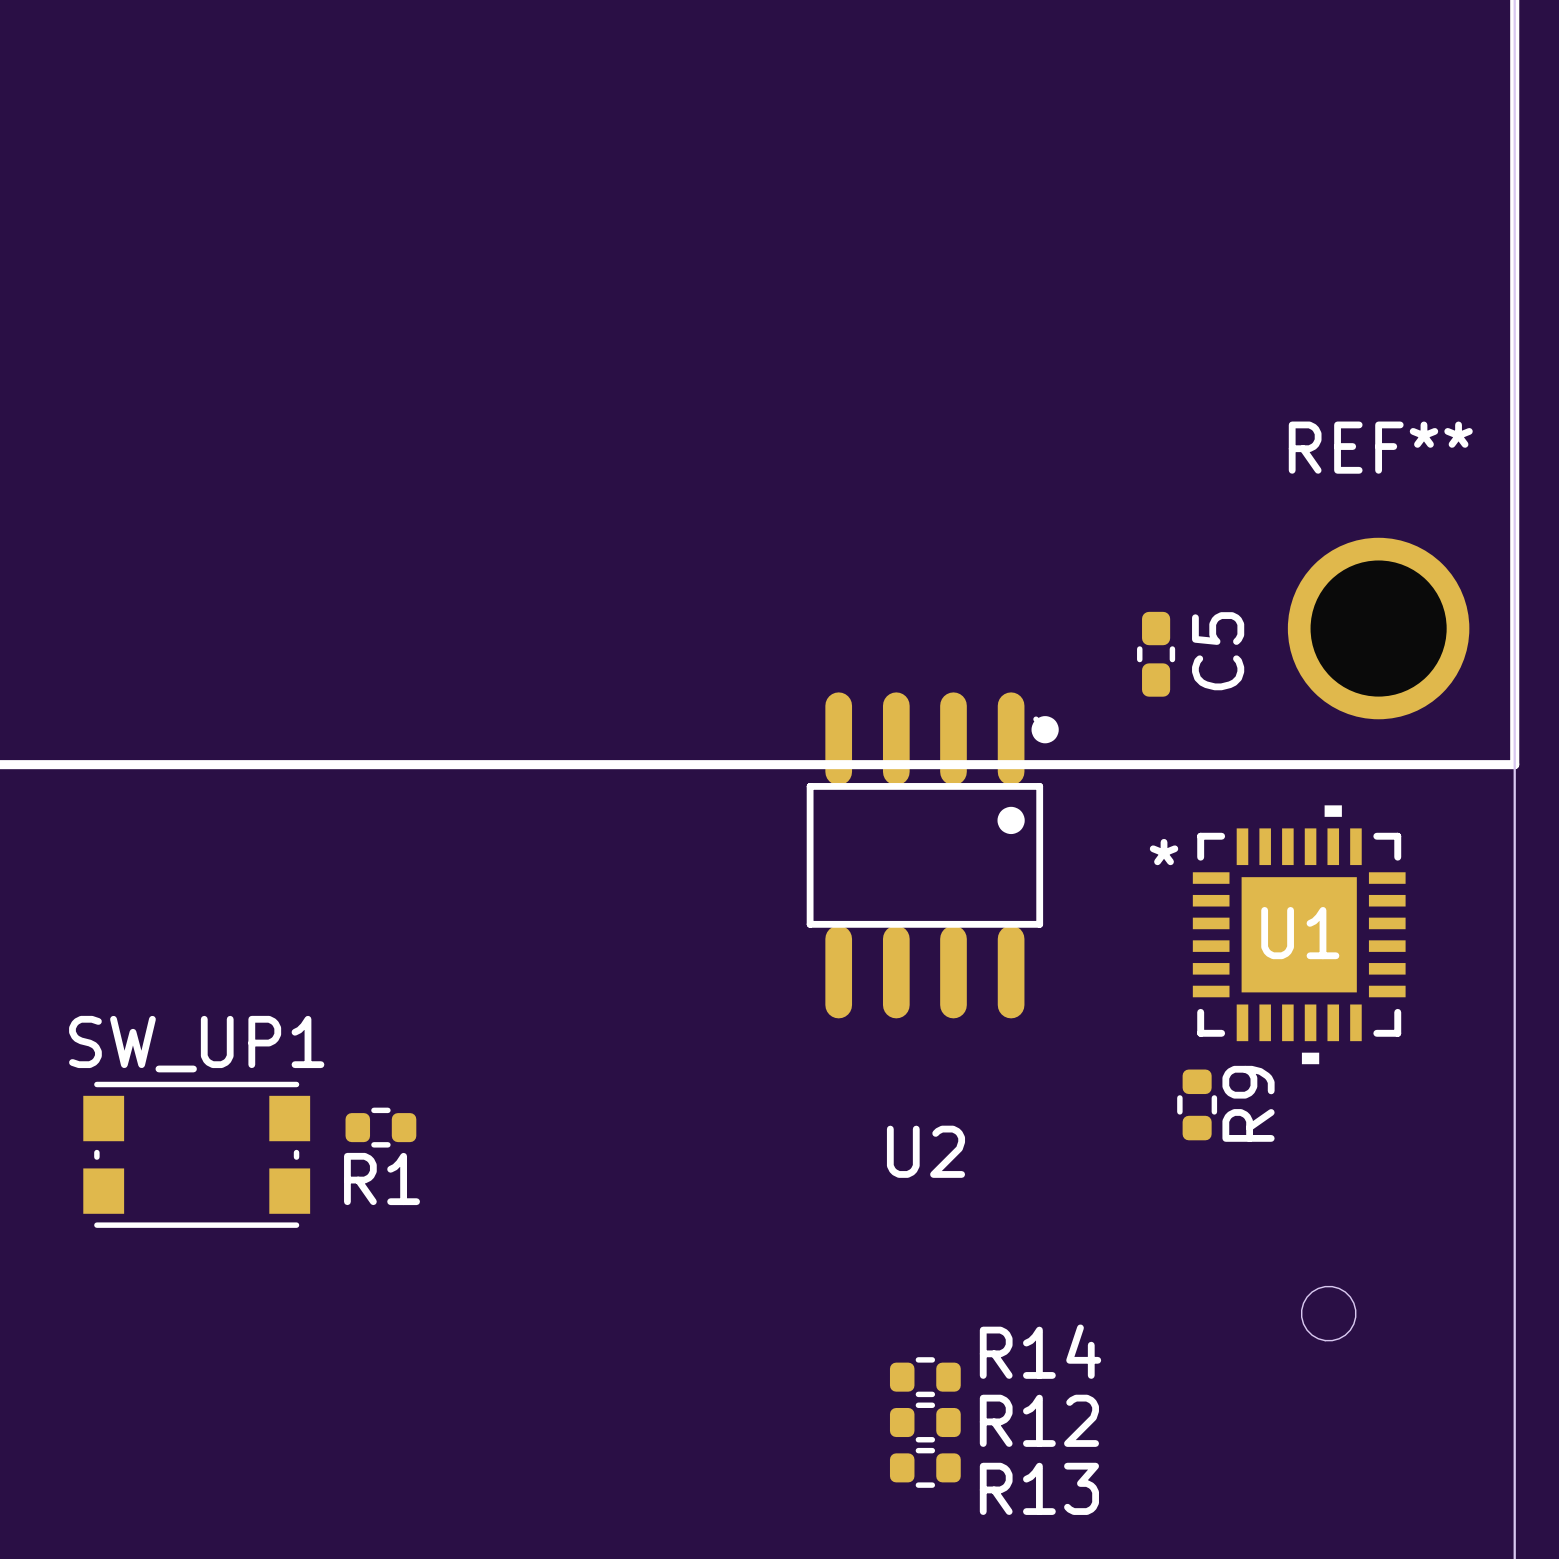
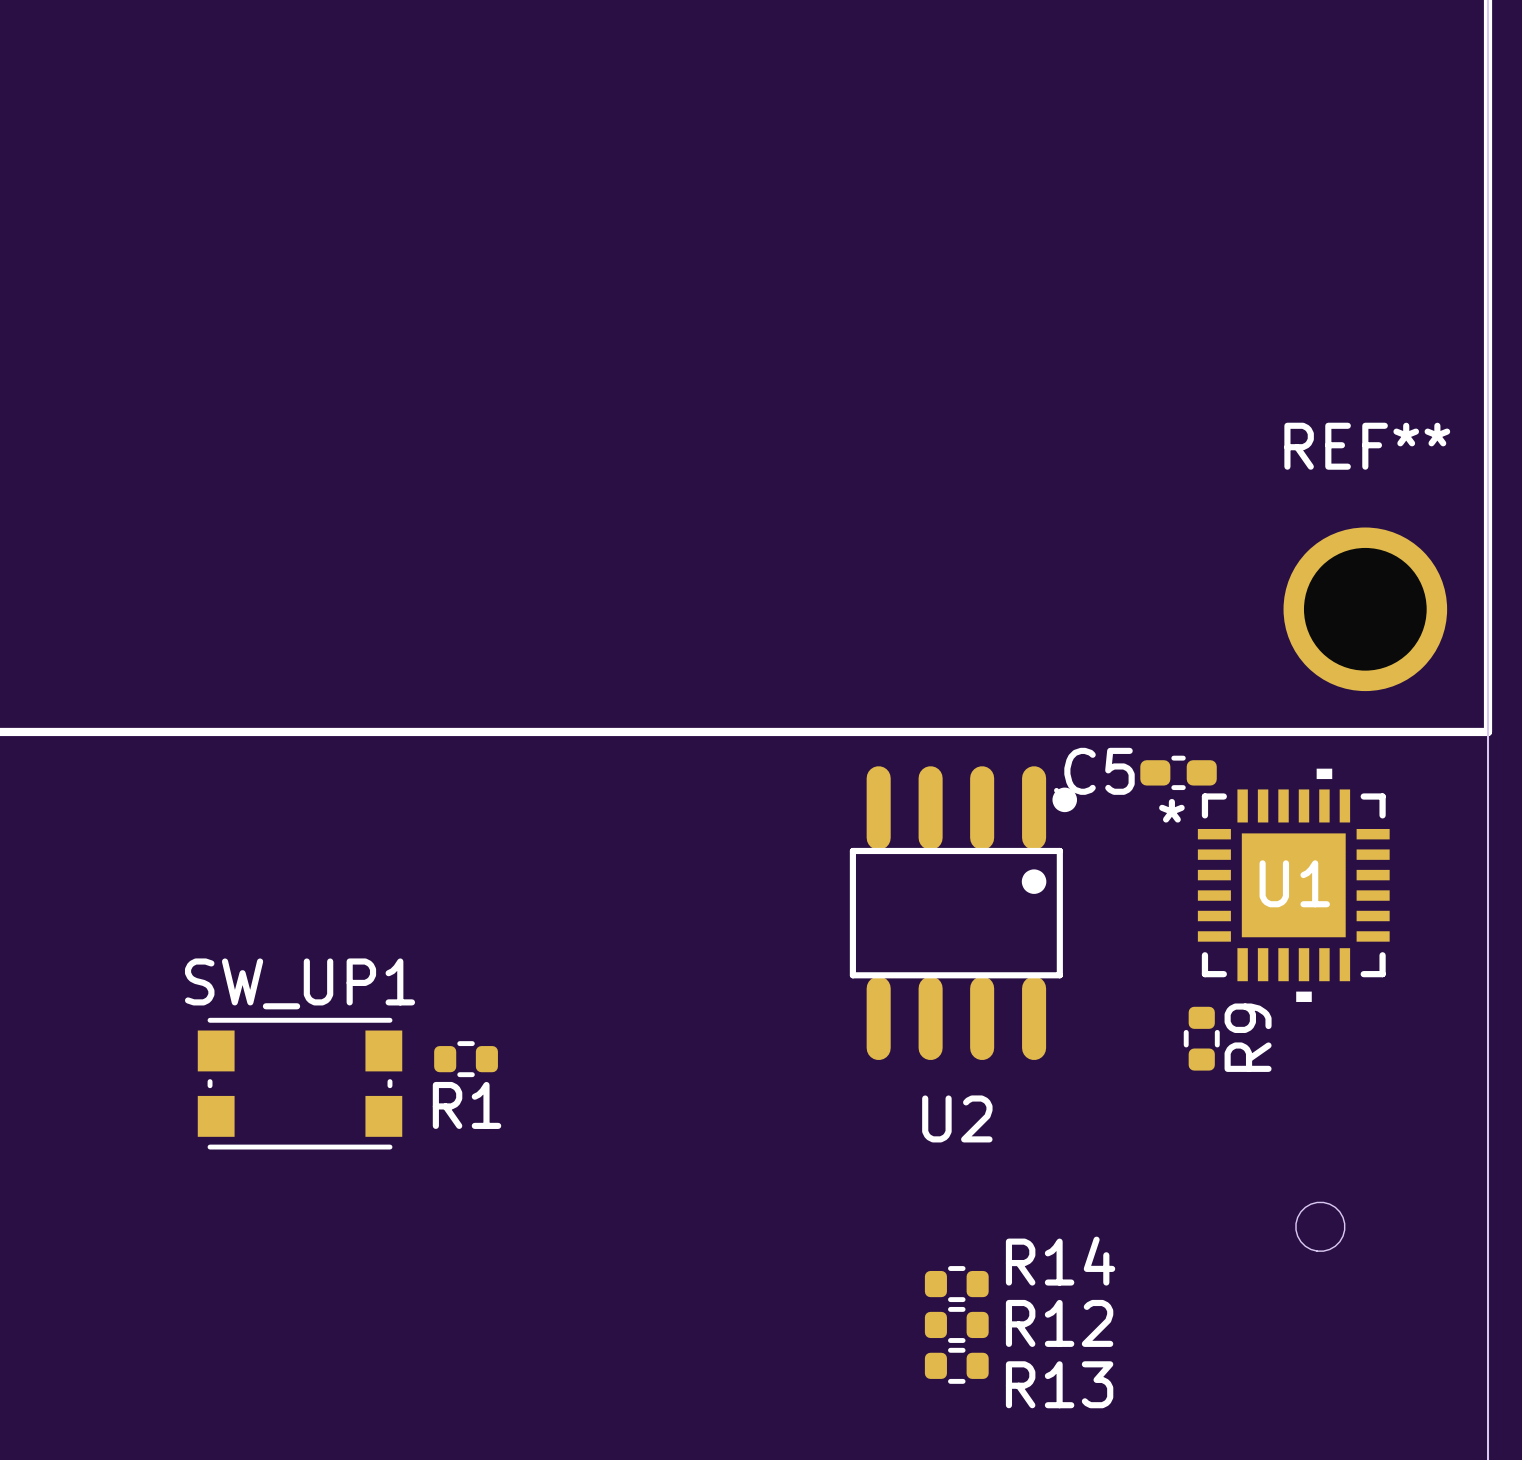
C5 name position: C5 (1218, 651) -> C5 (1099, 771)
C5 rotation: 0° (1156, 654) -> 90° clockwise (1178, 772)
C5 position: (1156, 654) -> (1178, 772)
U2 position: (932, 855) -> (963, 913)
U2 name position: U2 (925, 1151) -> U2 (957, 1118)

